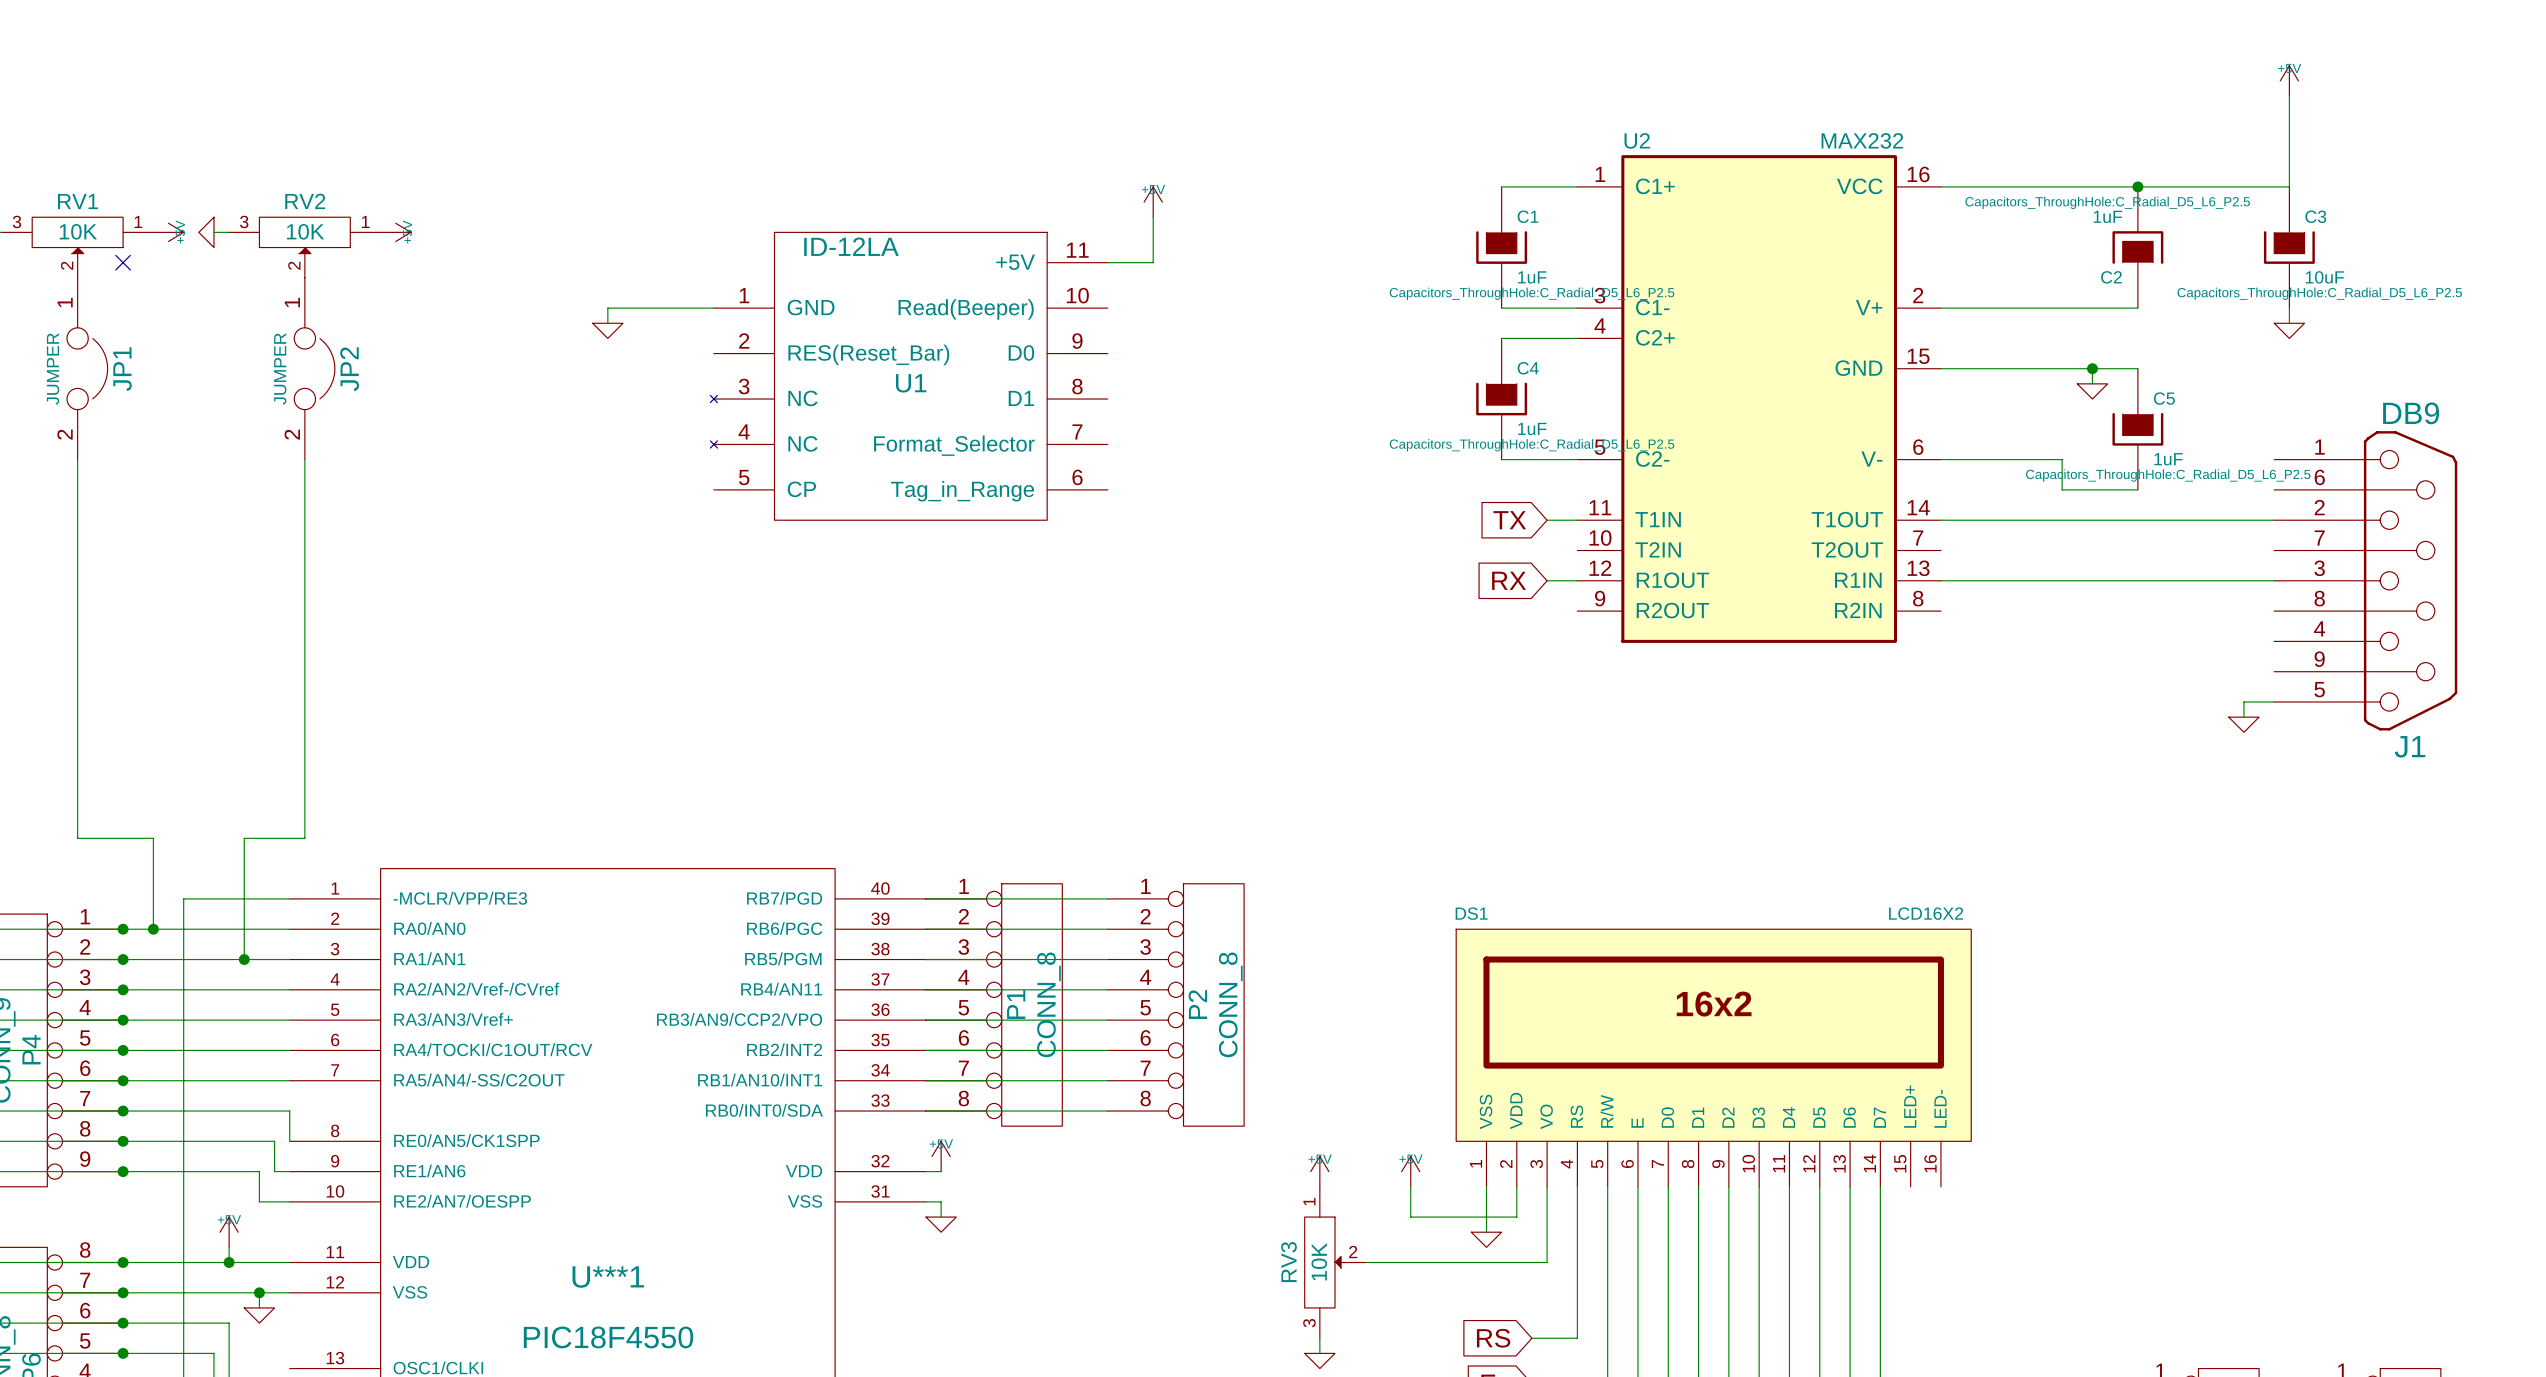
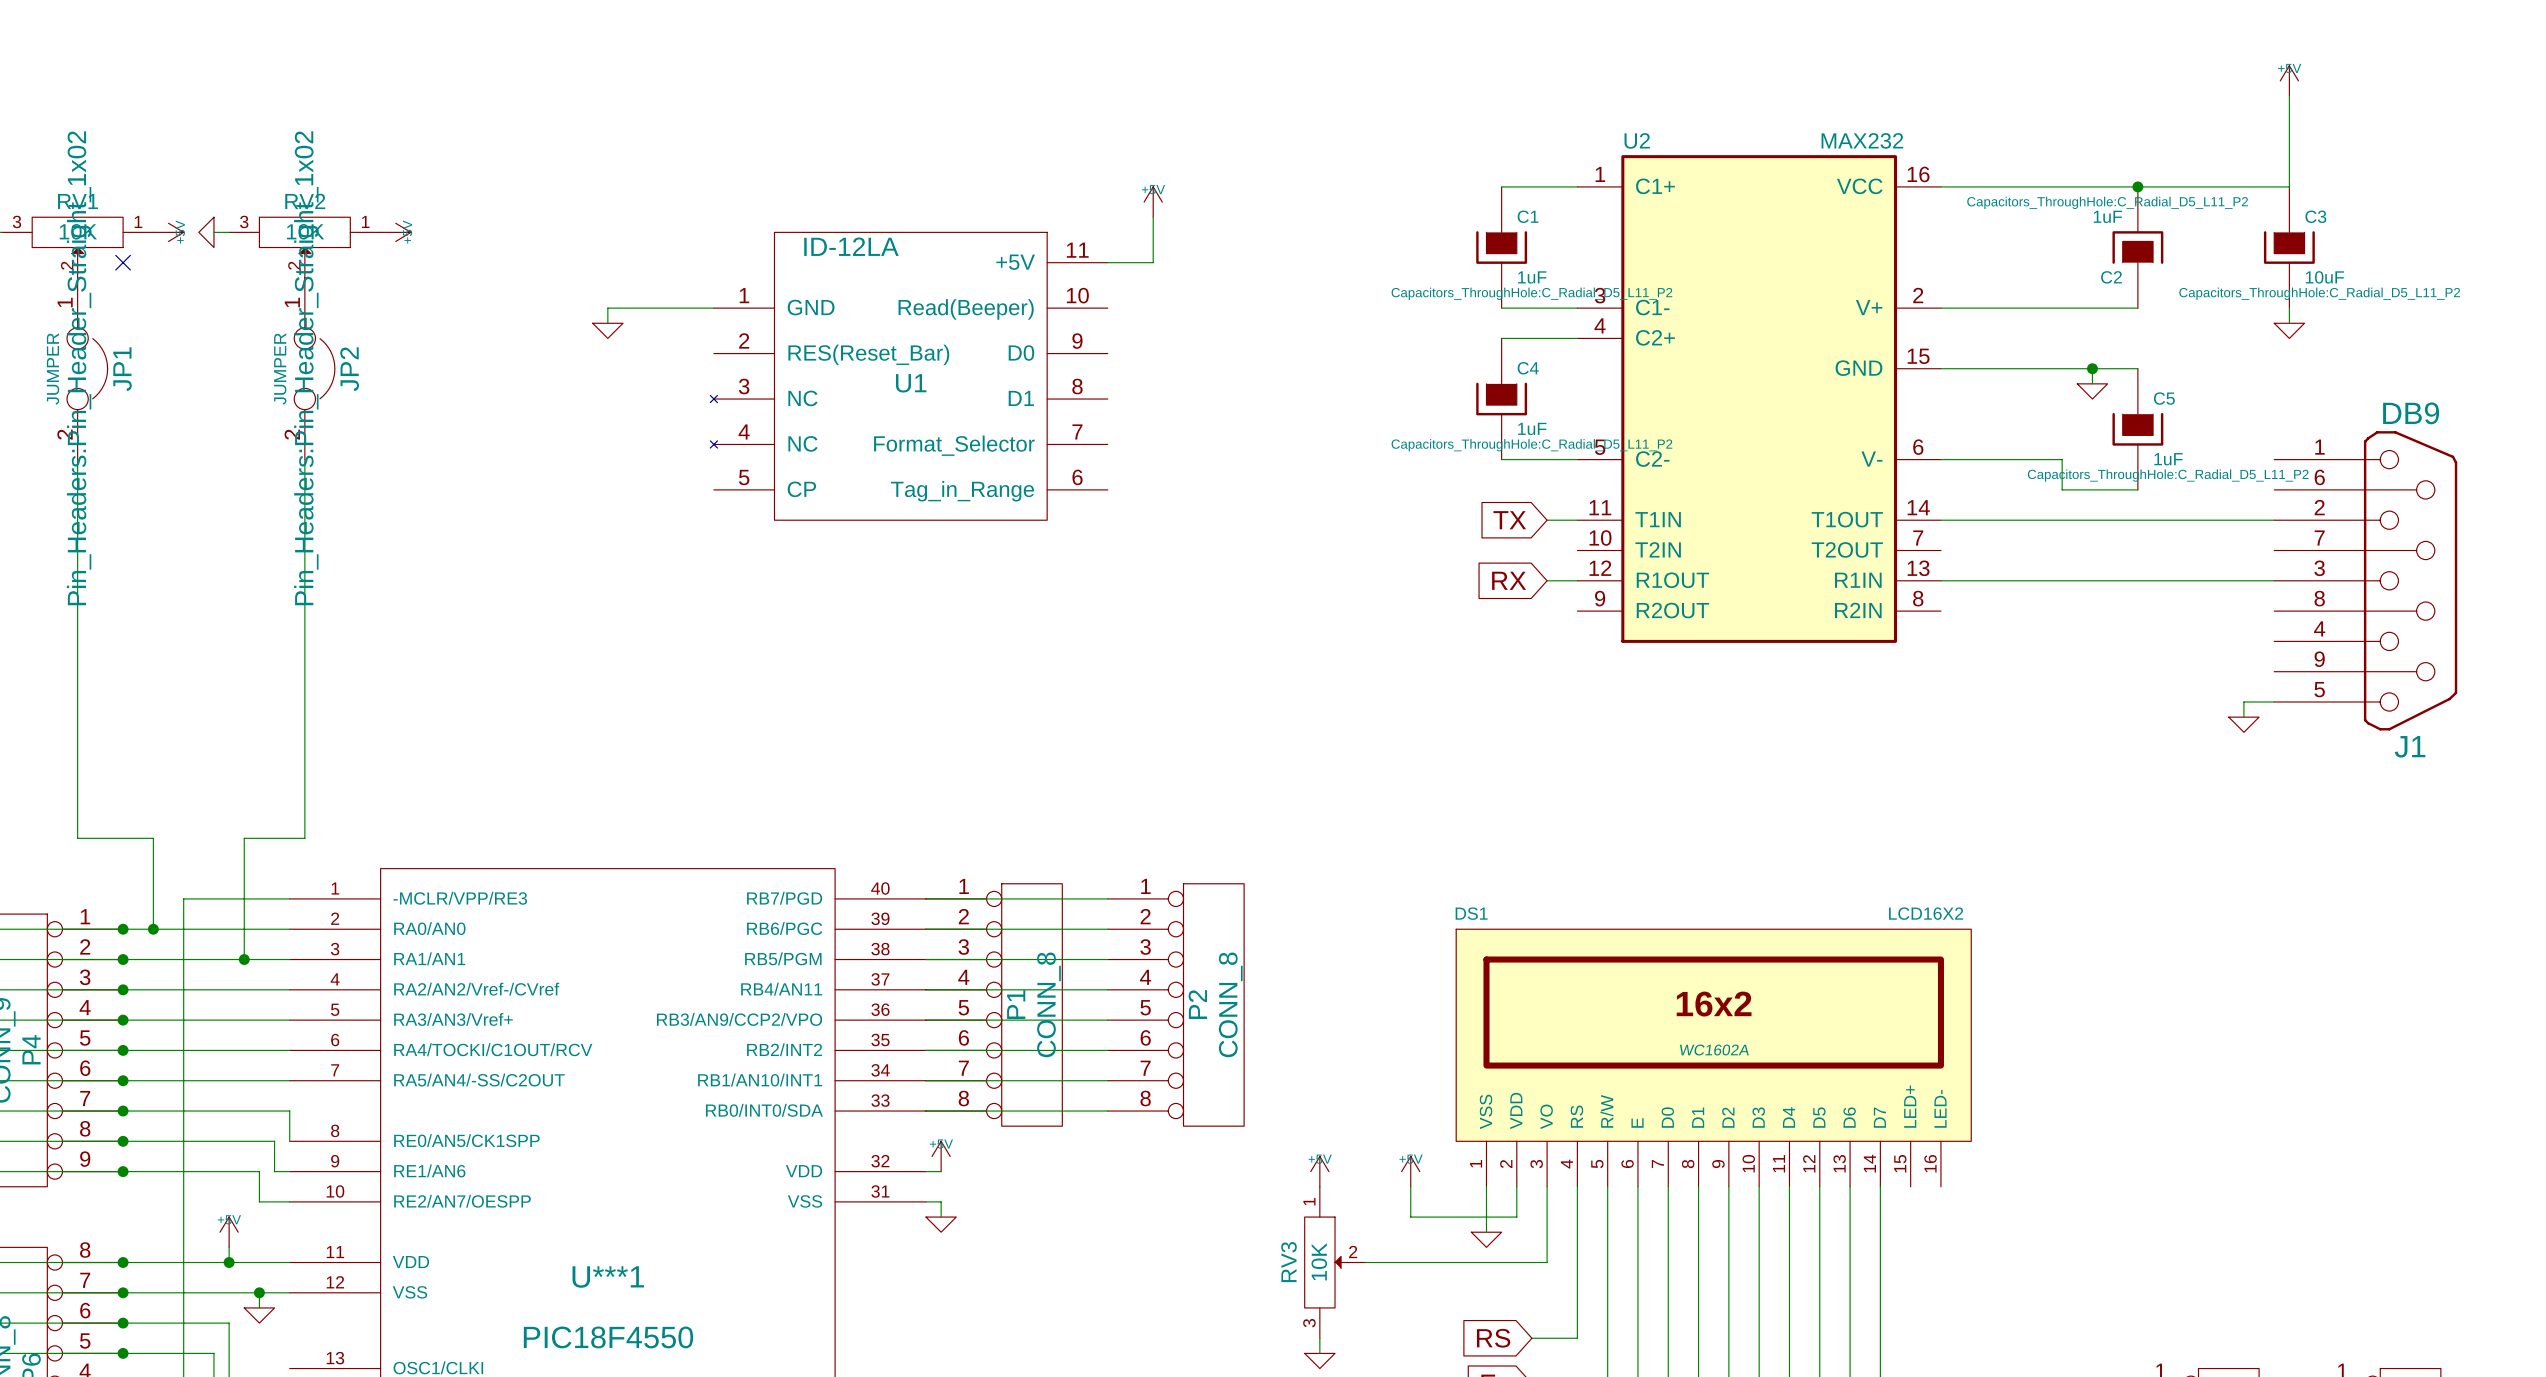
C2 text: Capacitors_ThroughHole:C_Radial_D5_L6_P2.5 (2107, 202) -> Capacitors_ThroughHole:C_Radial_D5_L11_P2 (2107, 202)
C1 text: Capacitors_ThroughHole:C_Radial_D5_L6_P2.5 (1531, 293) -> Capacitors_ThroughHole:C_Radial_D5_L11_P2 (1531, 293)
C3 text: Capacitors_ThroughHole:C_Radial_D5_L6_P2.5 (2319, 293) -> Capacitors_ThroughHole:C_Radial_D5_L11_P2 (2319, 293)
JP1 text: none -> Pin_Headers:Pin_Header_Straight_1x02 (79, 368)
JP2 text: none -> Pin_Headers:Pin_Header_Straight_1x02 (306, 368)
C4 text: Capacitors_ThroughHole:C_Radial_D5_L6_P2.5 (1531, 445) -> Capacitors_ThroughHole:C_Radial_D5_L11_P2 (1531, 445)
C5 text: Capacitors_ThroughHole:C_Radial_D5_L6_P2.5 (2168, 475) -> Capacitors_ThroughHole:C_Radial_D5_L11_P2 (2168, 475)
DS1 text: none -> WC1602A (1714, 1050)

